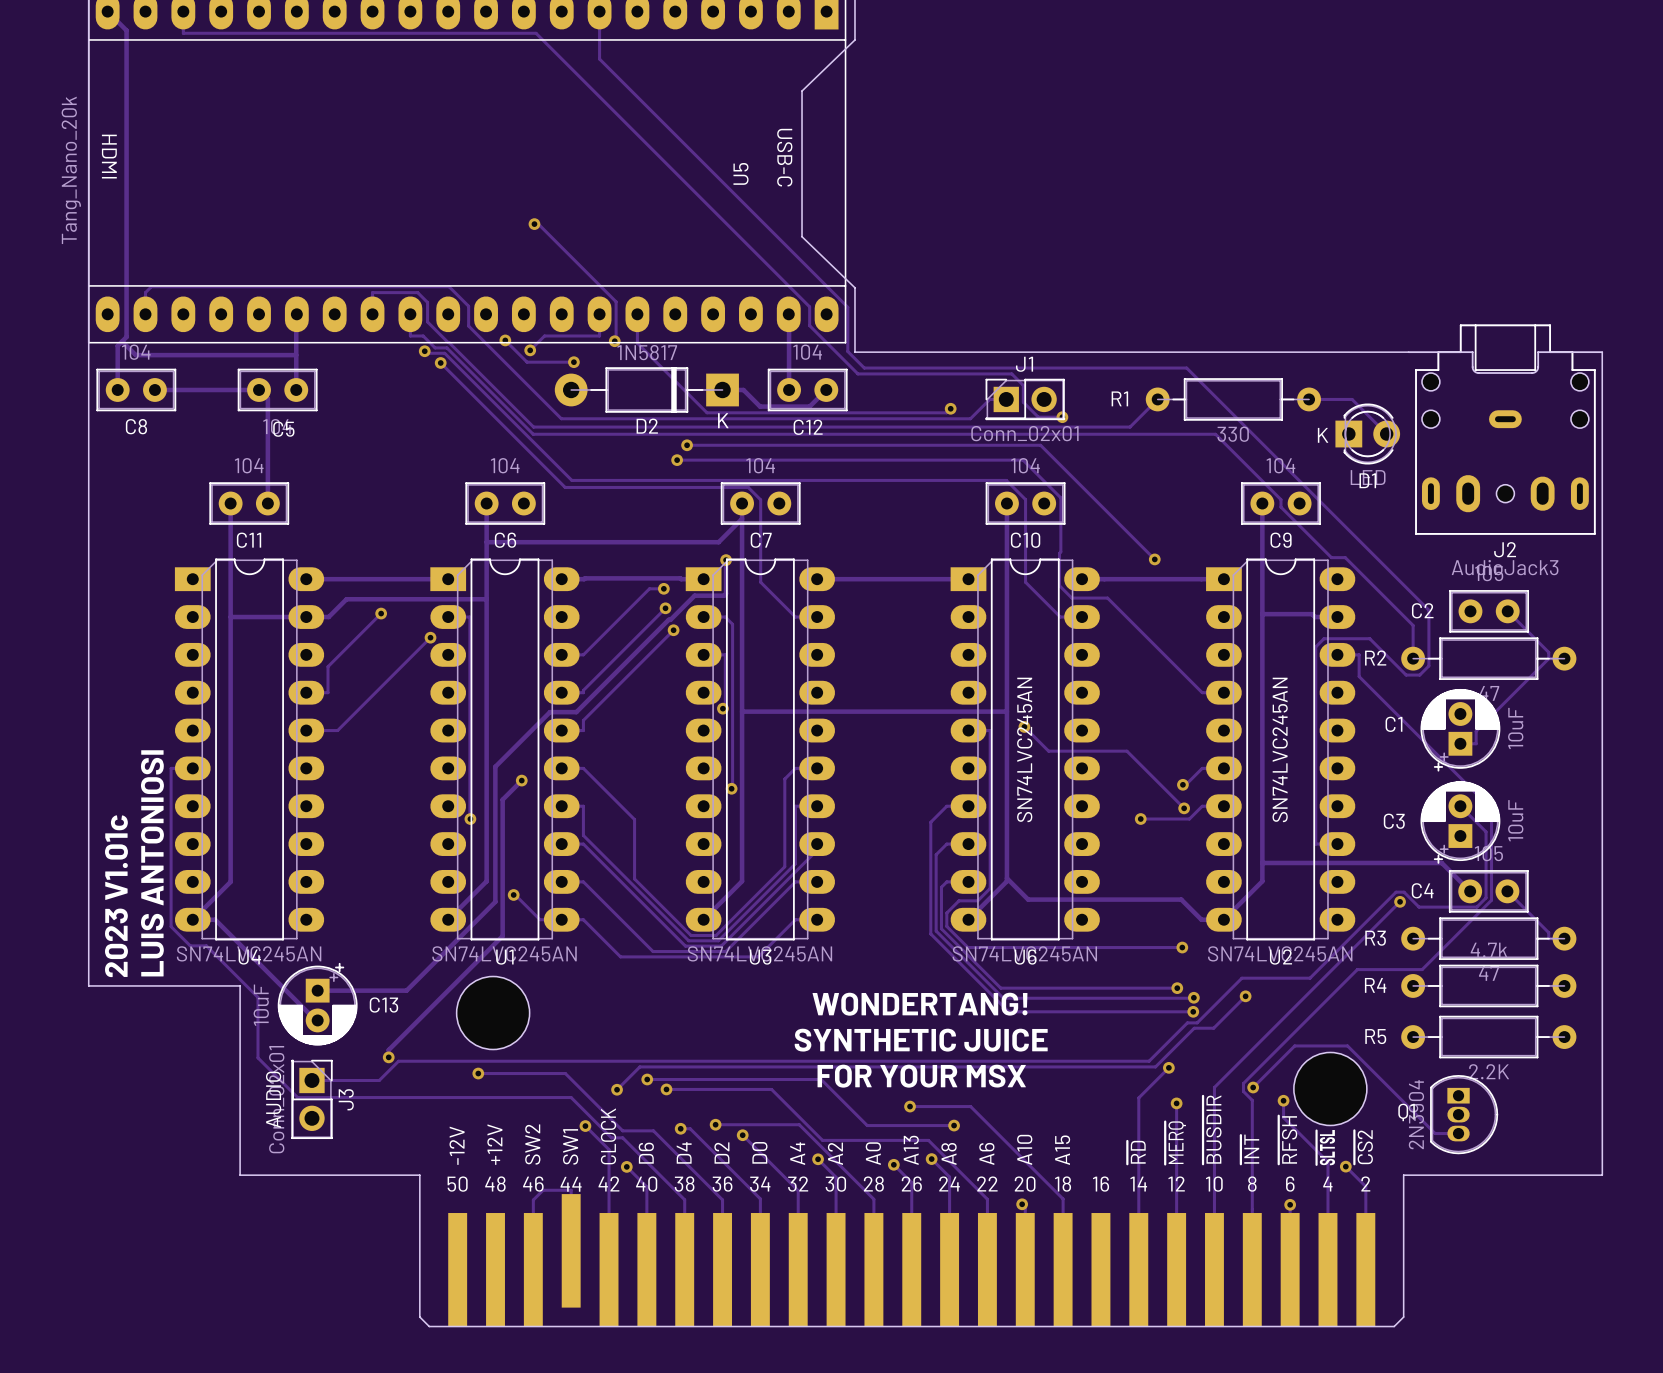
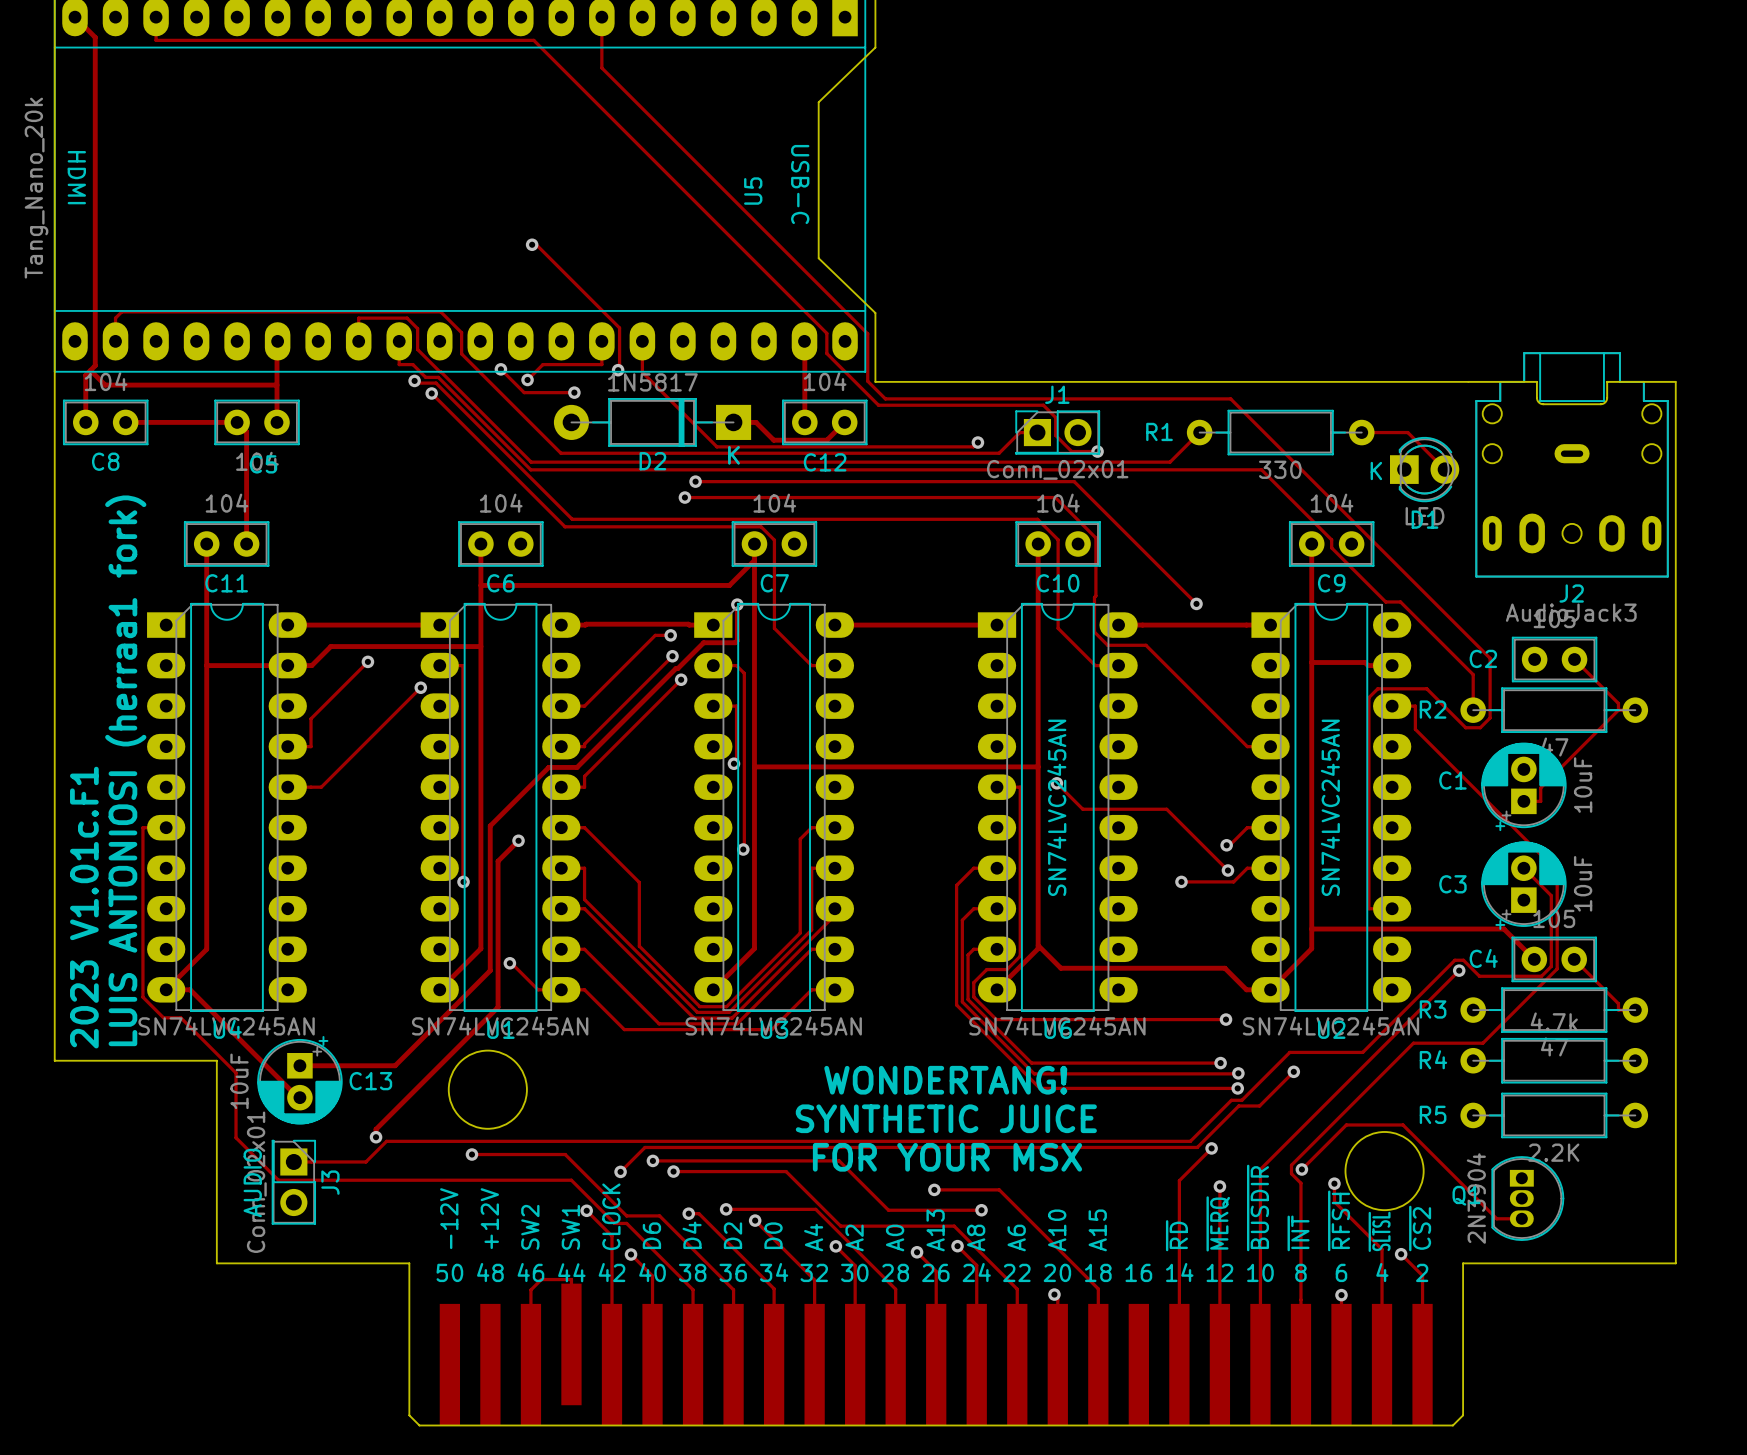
text: LUIS ANTONIOSI (152, 863) -> LUIS ANTONIOSI (herraa1 fork) (125, 770)
text: 2023 V1.01c (116, 896) -> 2023 V1.01c.F1 (84, 907)

